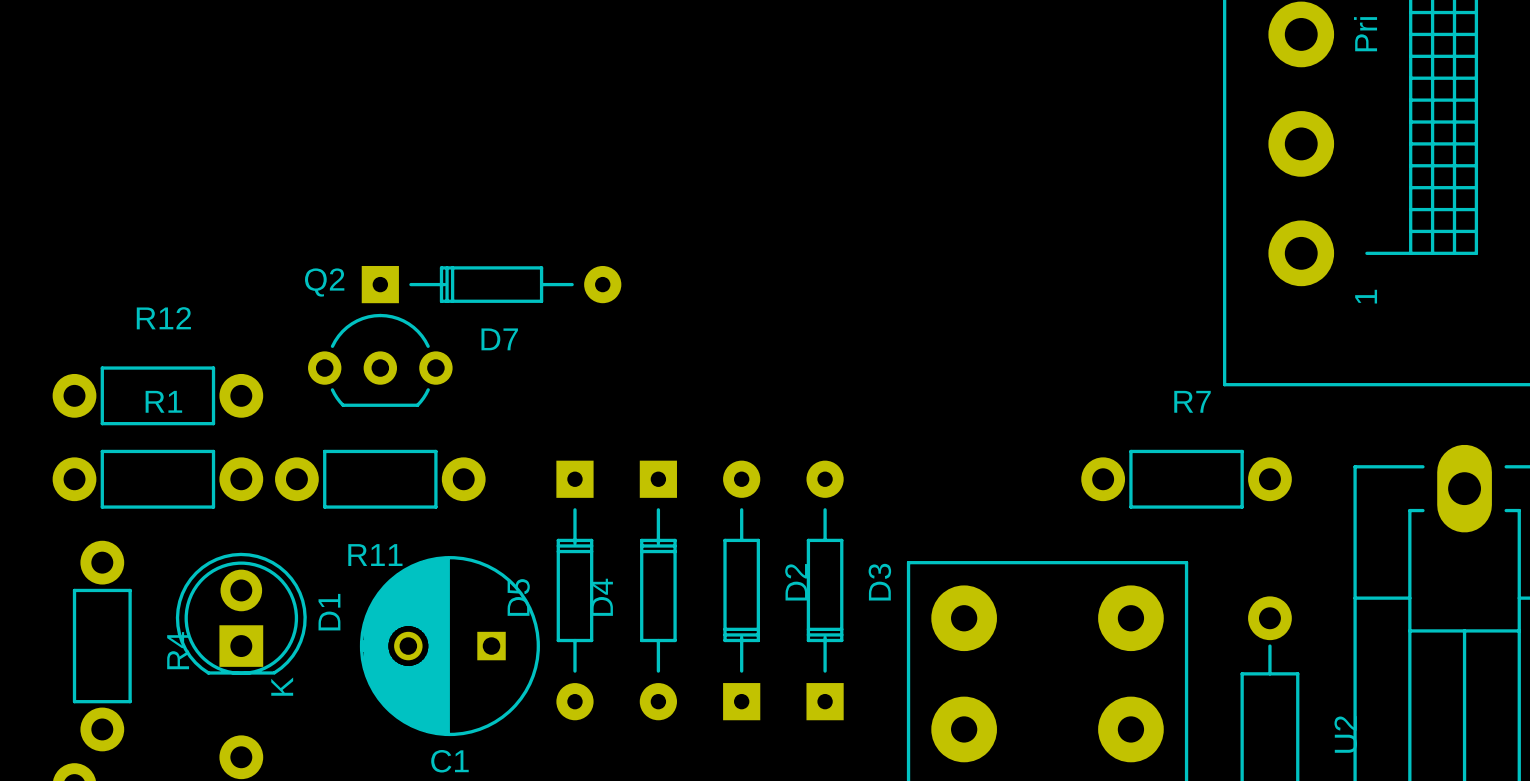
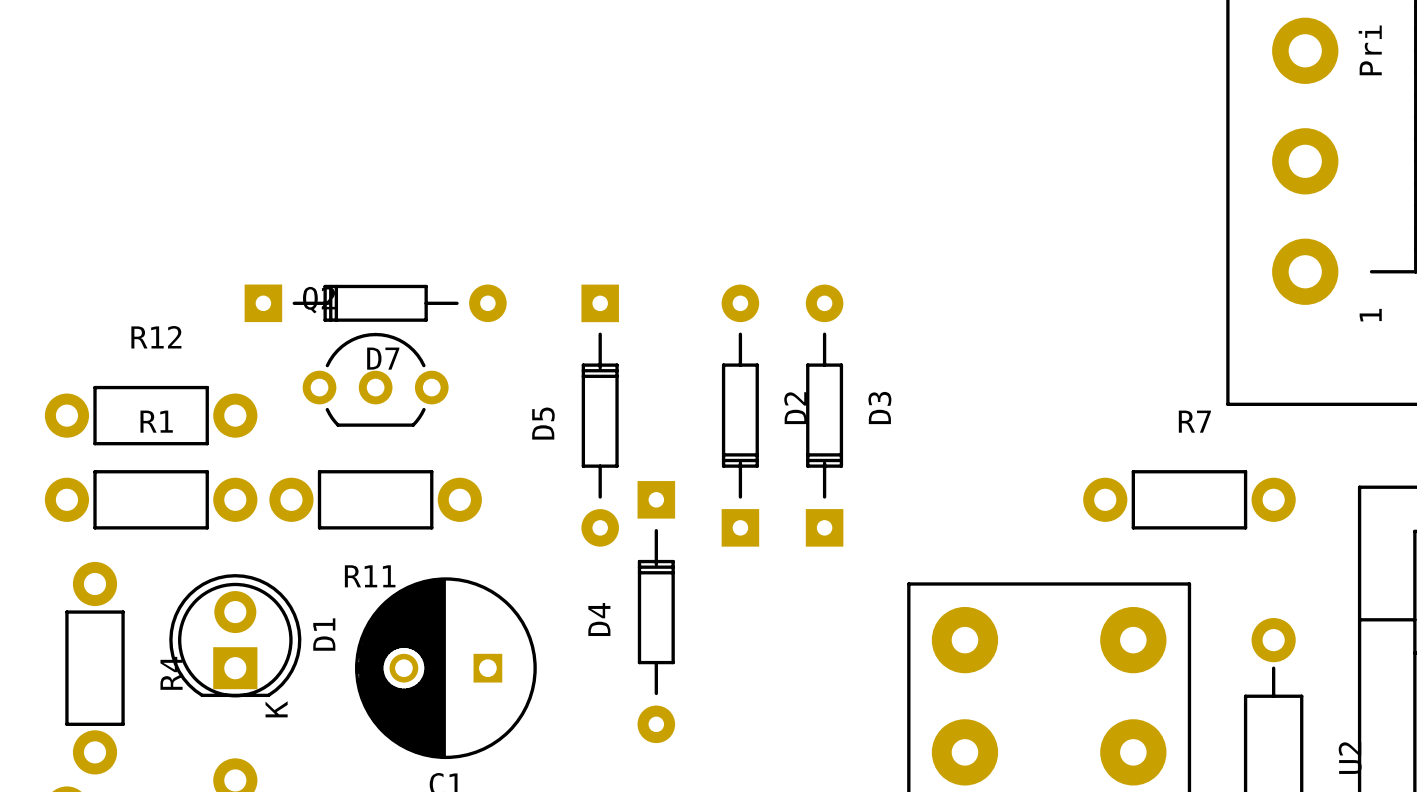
D7 position: (491, 284) -> (375, 303)
D5 position: (574, 590) -> (600, 415)
D2 position: (741, 590) -> (740, 415)
D3 position: (825, 590) -> (824, 415)

